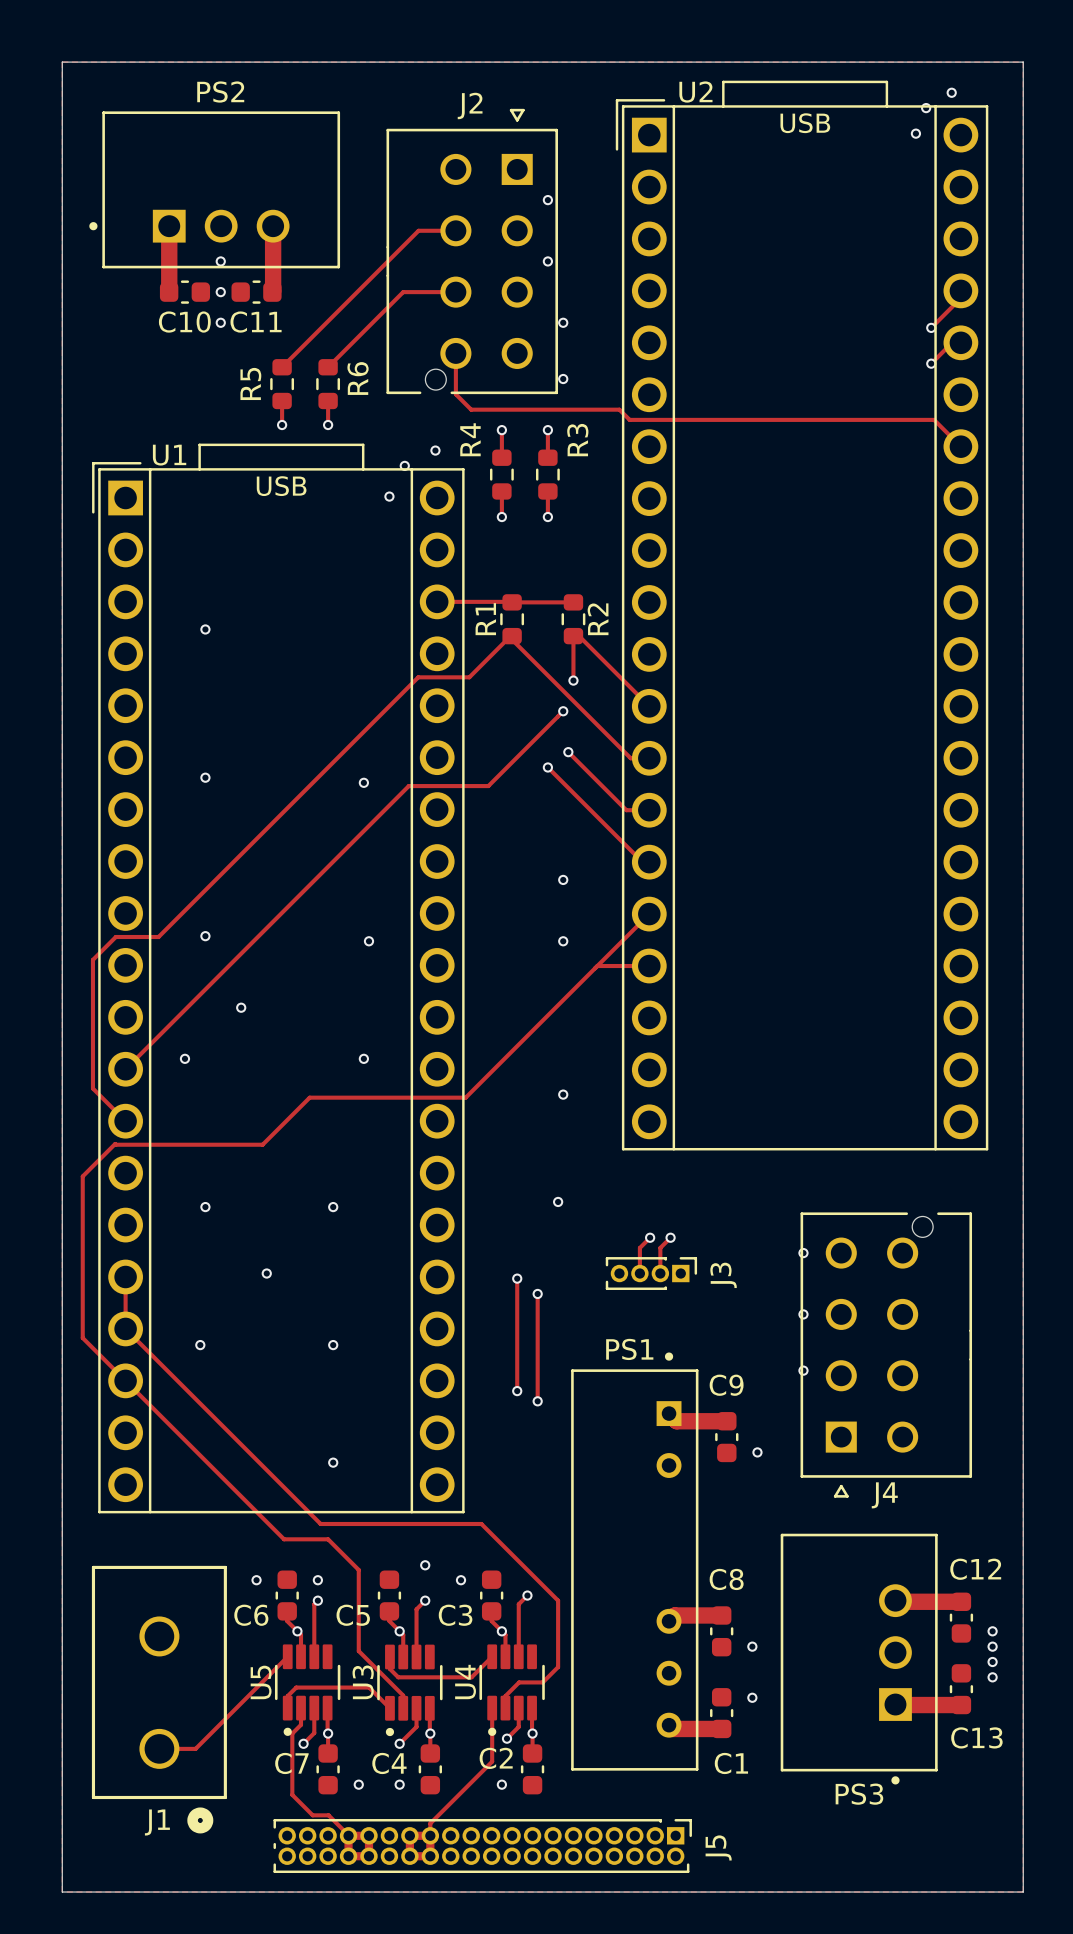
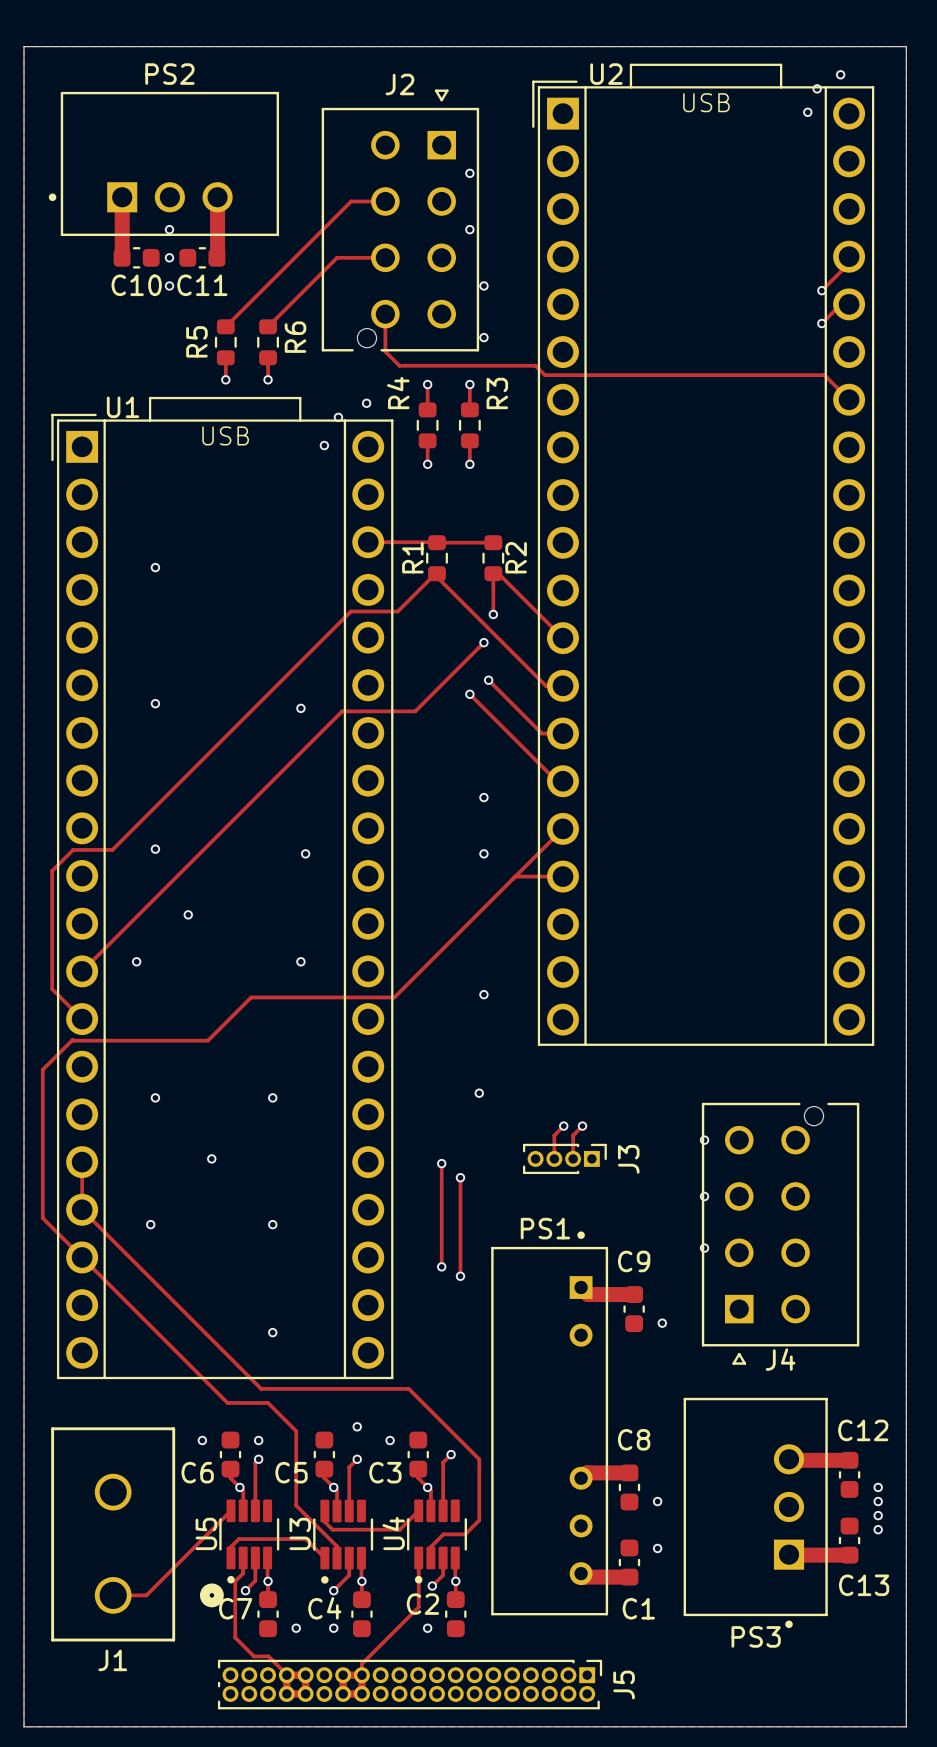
J1 footprint: [91, 1565, 227, 1834] -> [51, 1427, 224, 1642]

